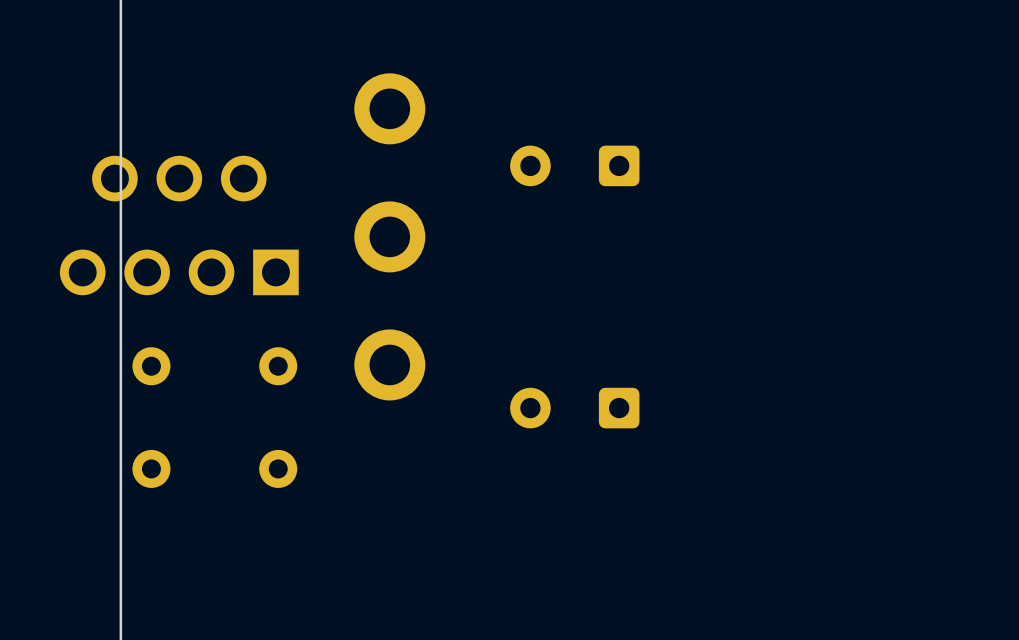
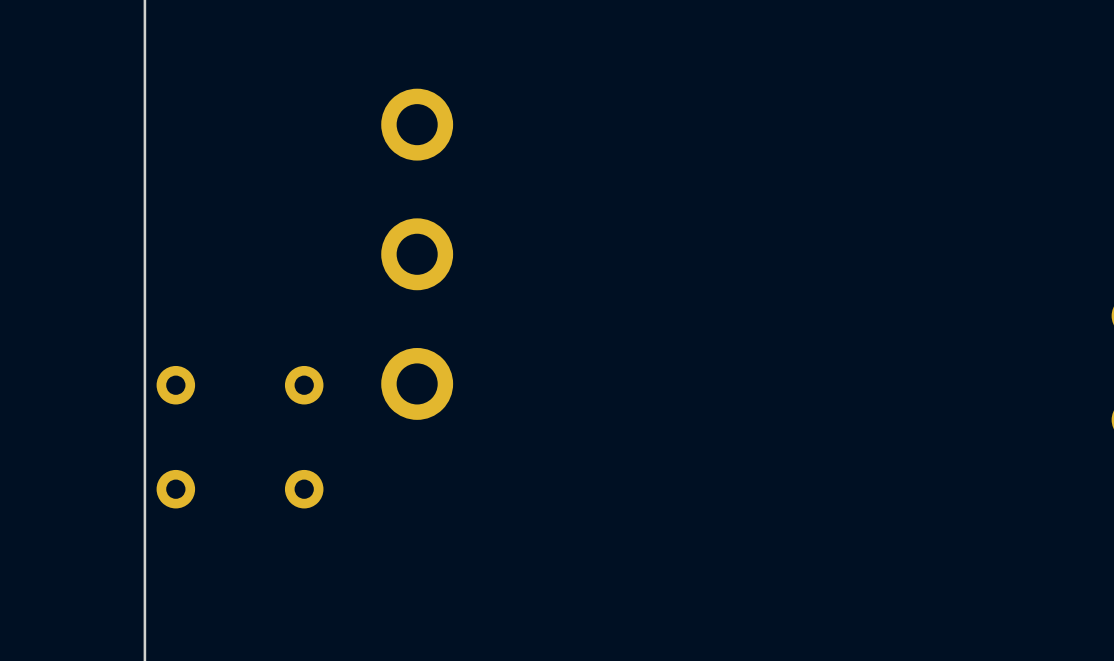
part: (574, 165) -> none
part: (179, 225) -> none
part: (574, 408) -> none

